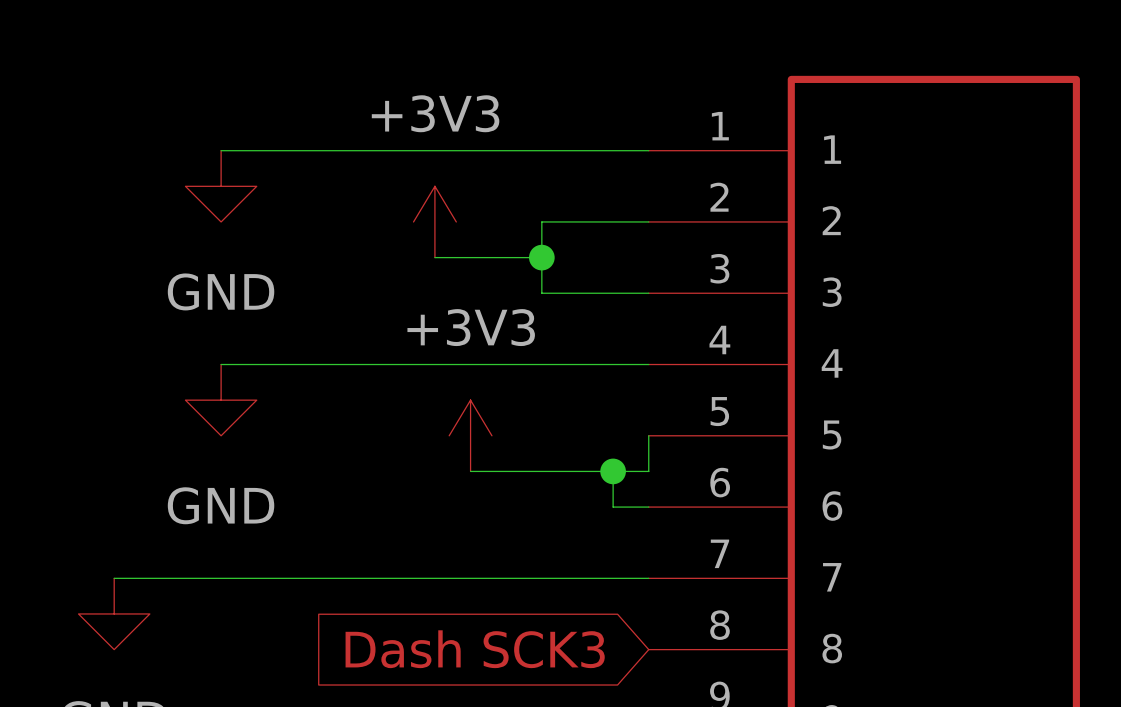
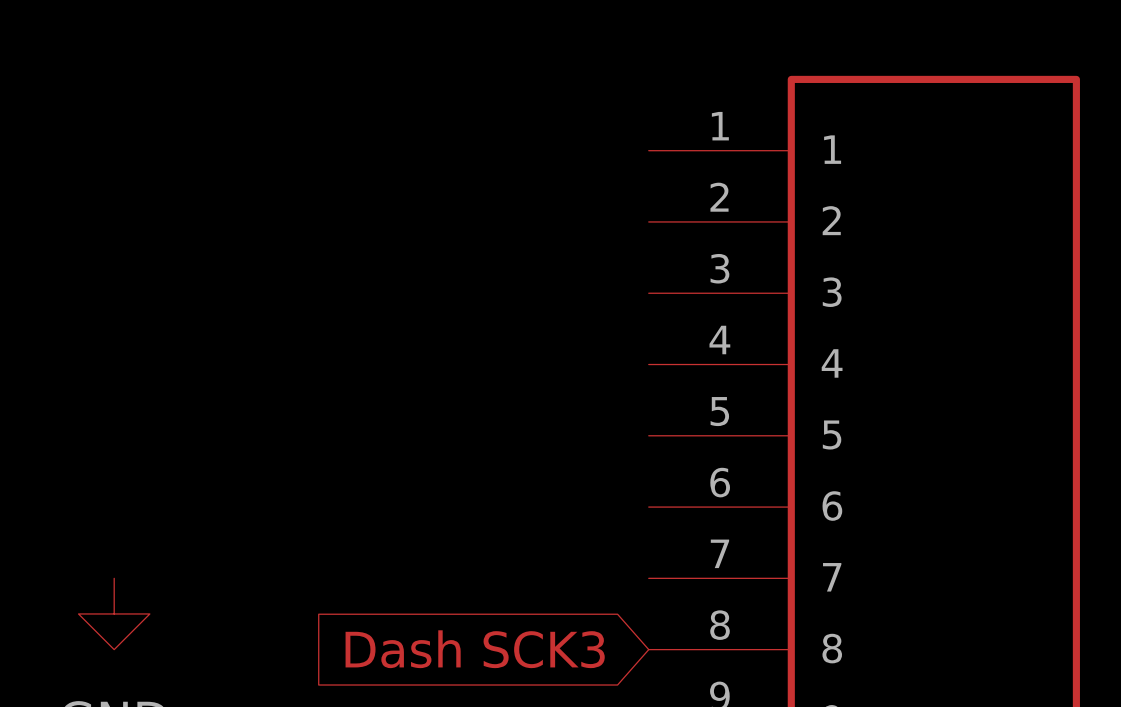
wire: (221, 150) (648, 150) -> none
power symbol: GND (221, 186) -> none
power symbol: +3V3 (434, 221) -> none
wire: (648, 221) (541, 221) (541, 293) (648, 293) -> none
wire: (434, 257) (541, 257) -> none
junction: (541, 257) -> none
wire: (221, 364) (648, 364) -> none
power symbol: GND (221, 400) -> none
power symbol: +3V3 (470, 435) -> none
wire: (648, 435) (648, 471) (470, 471) -> none
wire: (613, 471) (613, 507) (648, 507) -> none
junction: (613, 471) -> none
wire: (114, 578) (648, 578) -> none

